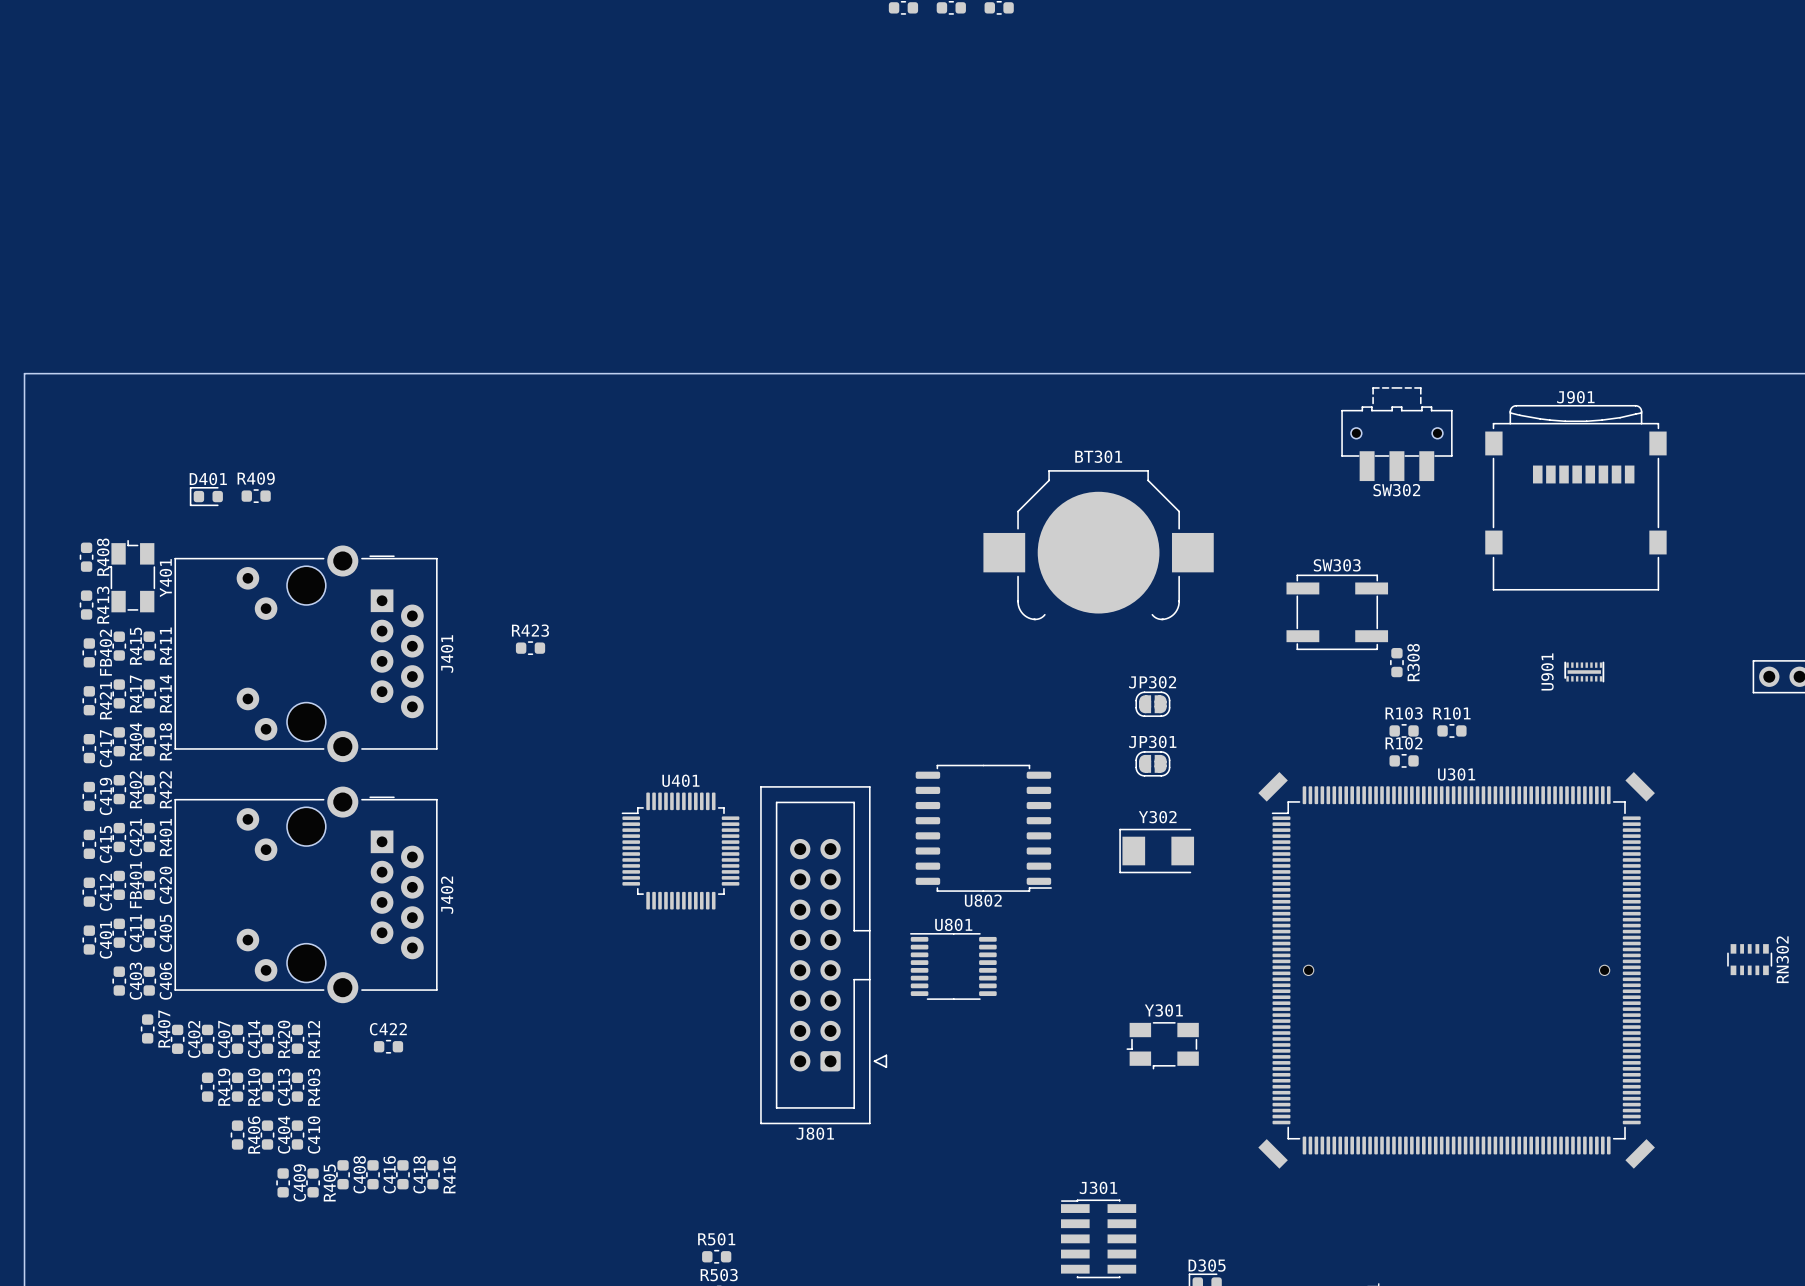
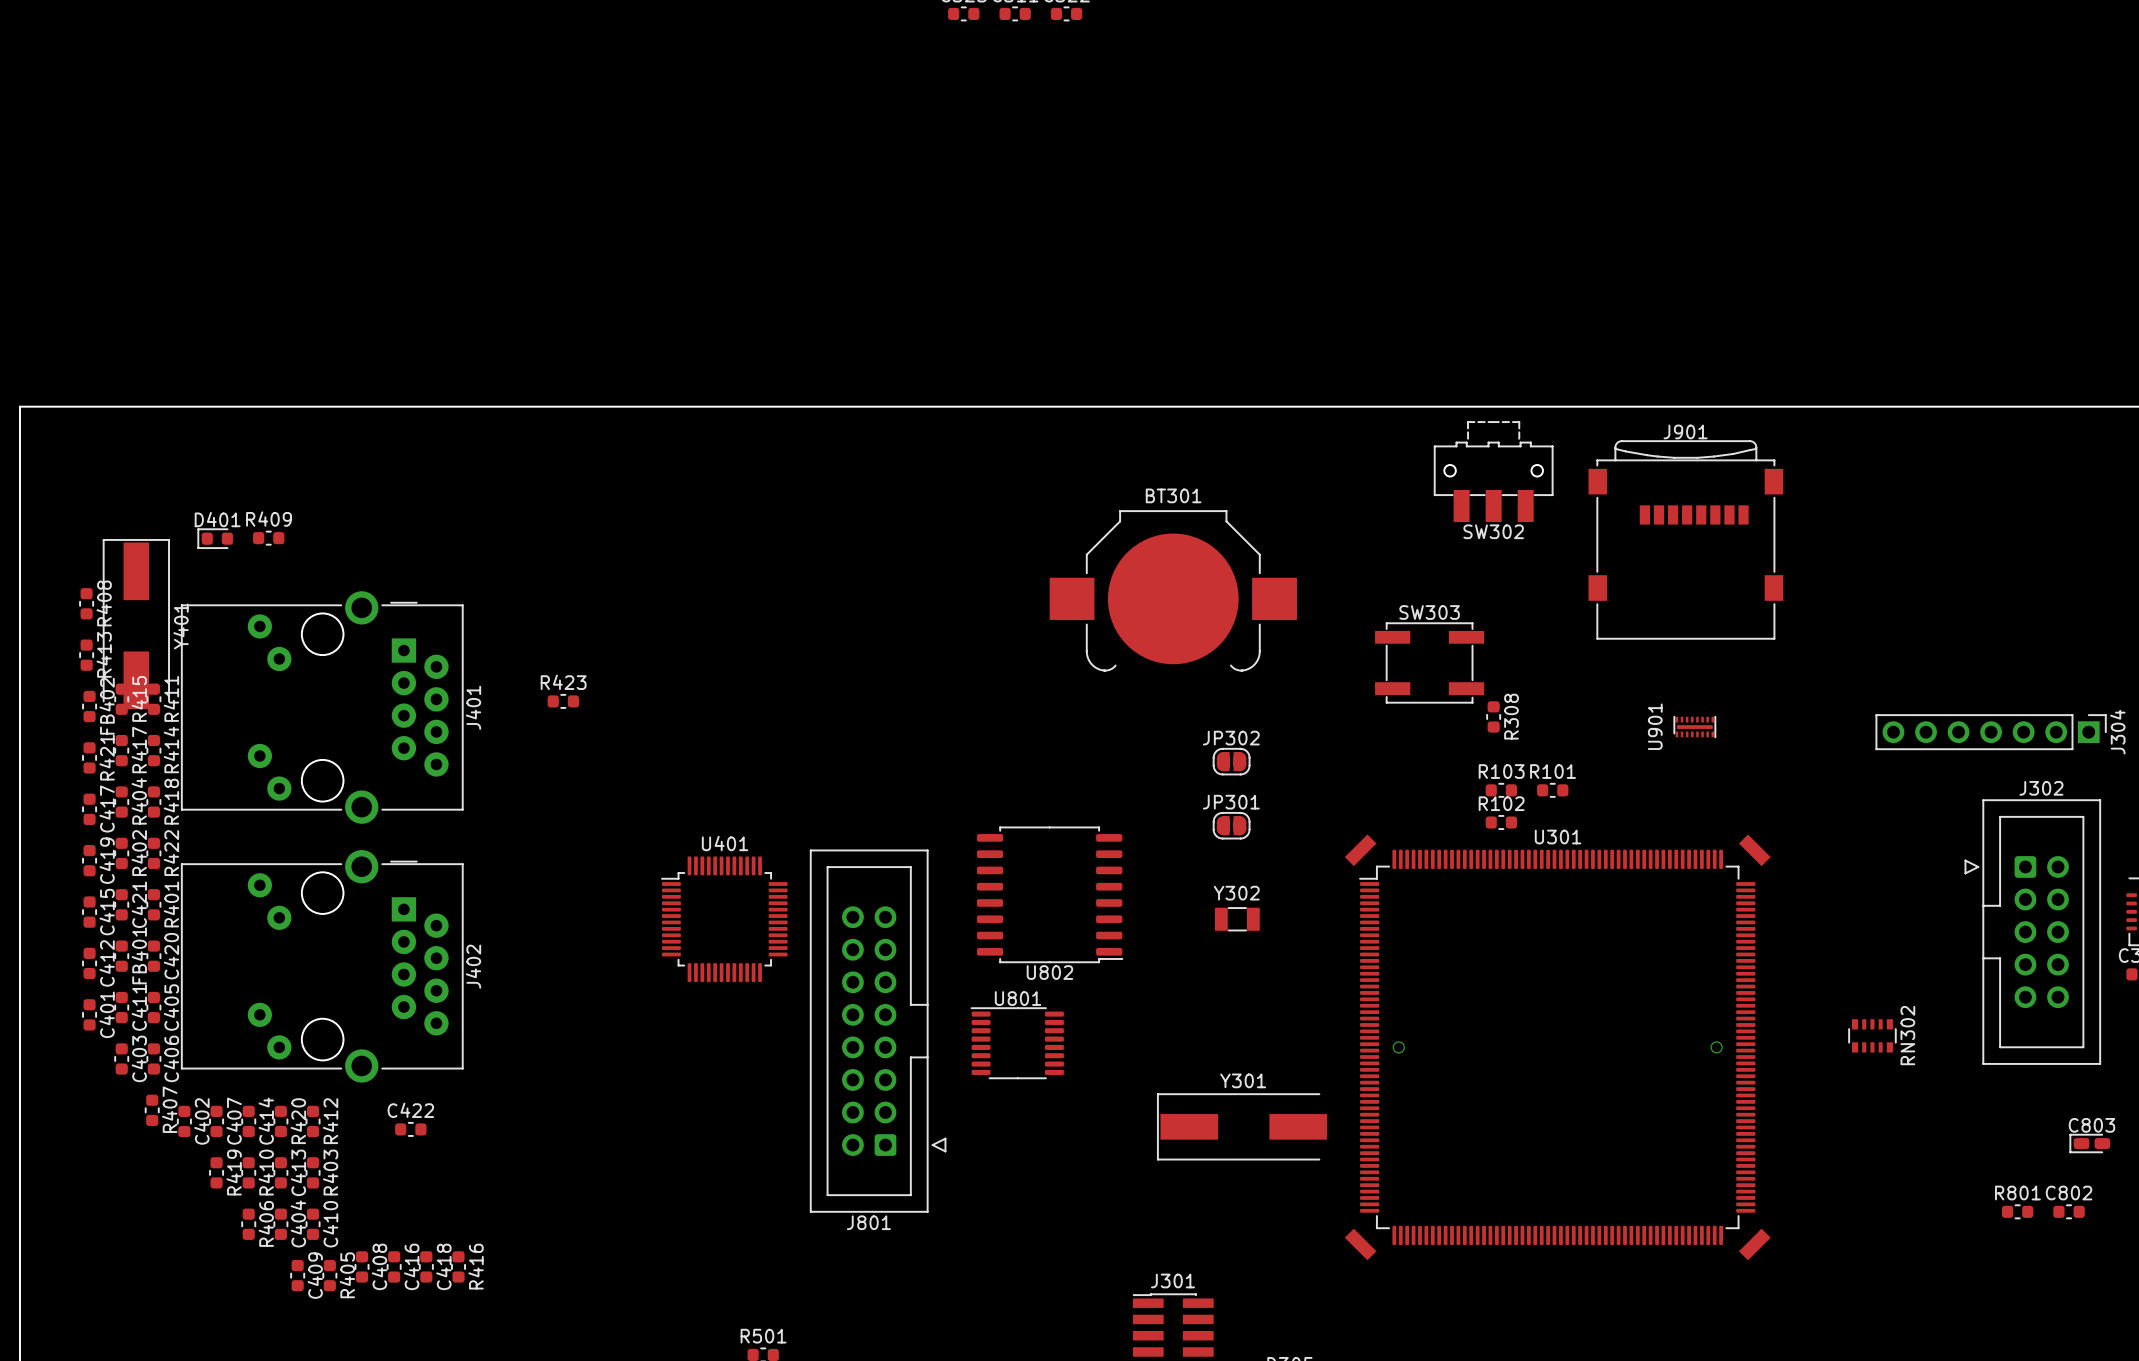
Y401 footprint: [107, 540, 156, 613] -> [102, 539, 170, 710]
Y302 footprint: [1119, 828, 1195, 874] -> [1214, 907, 1260, 932]
Y301 footprint: [1126, 1022, 1199, 1070] -> [1157, 1093, 1328, 1161]

